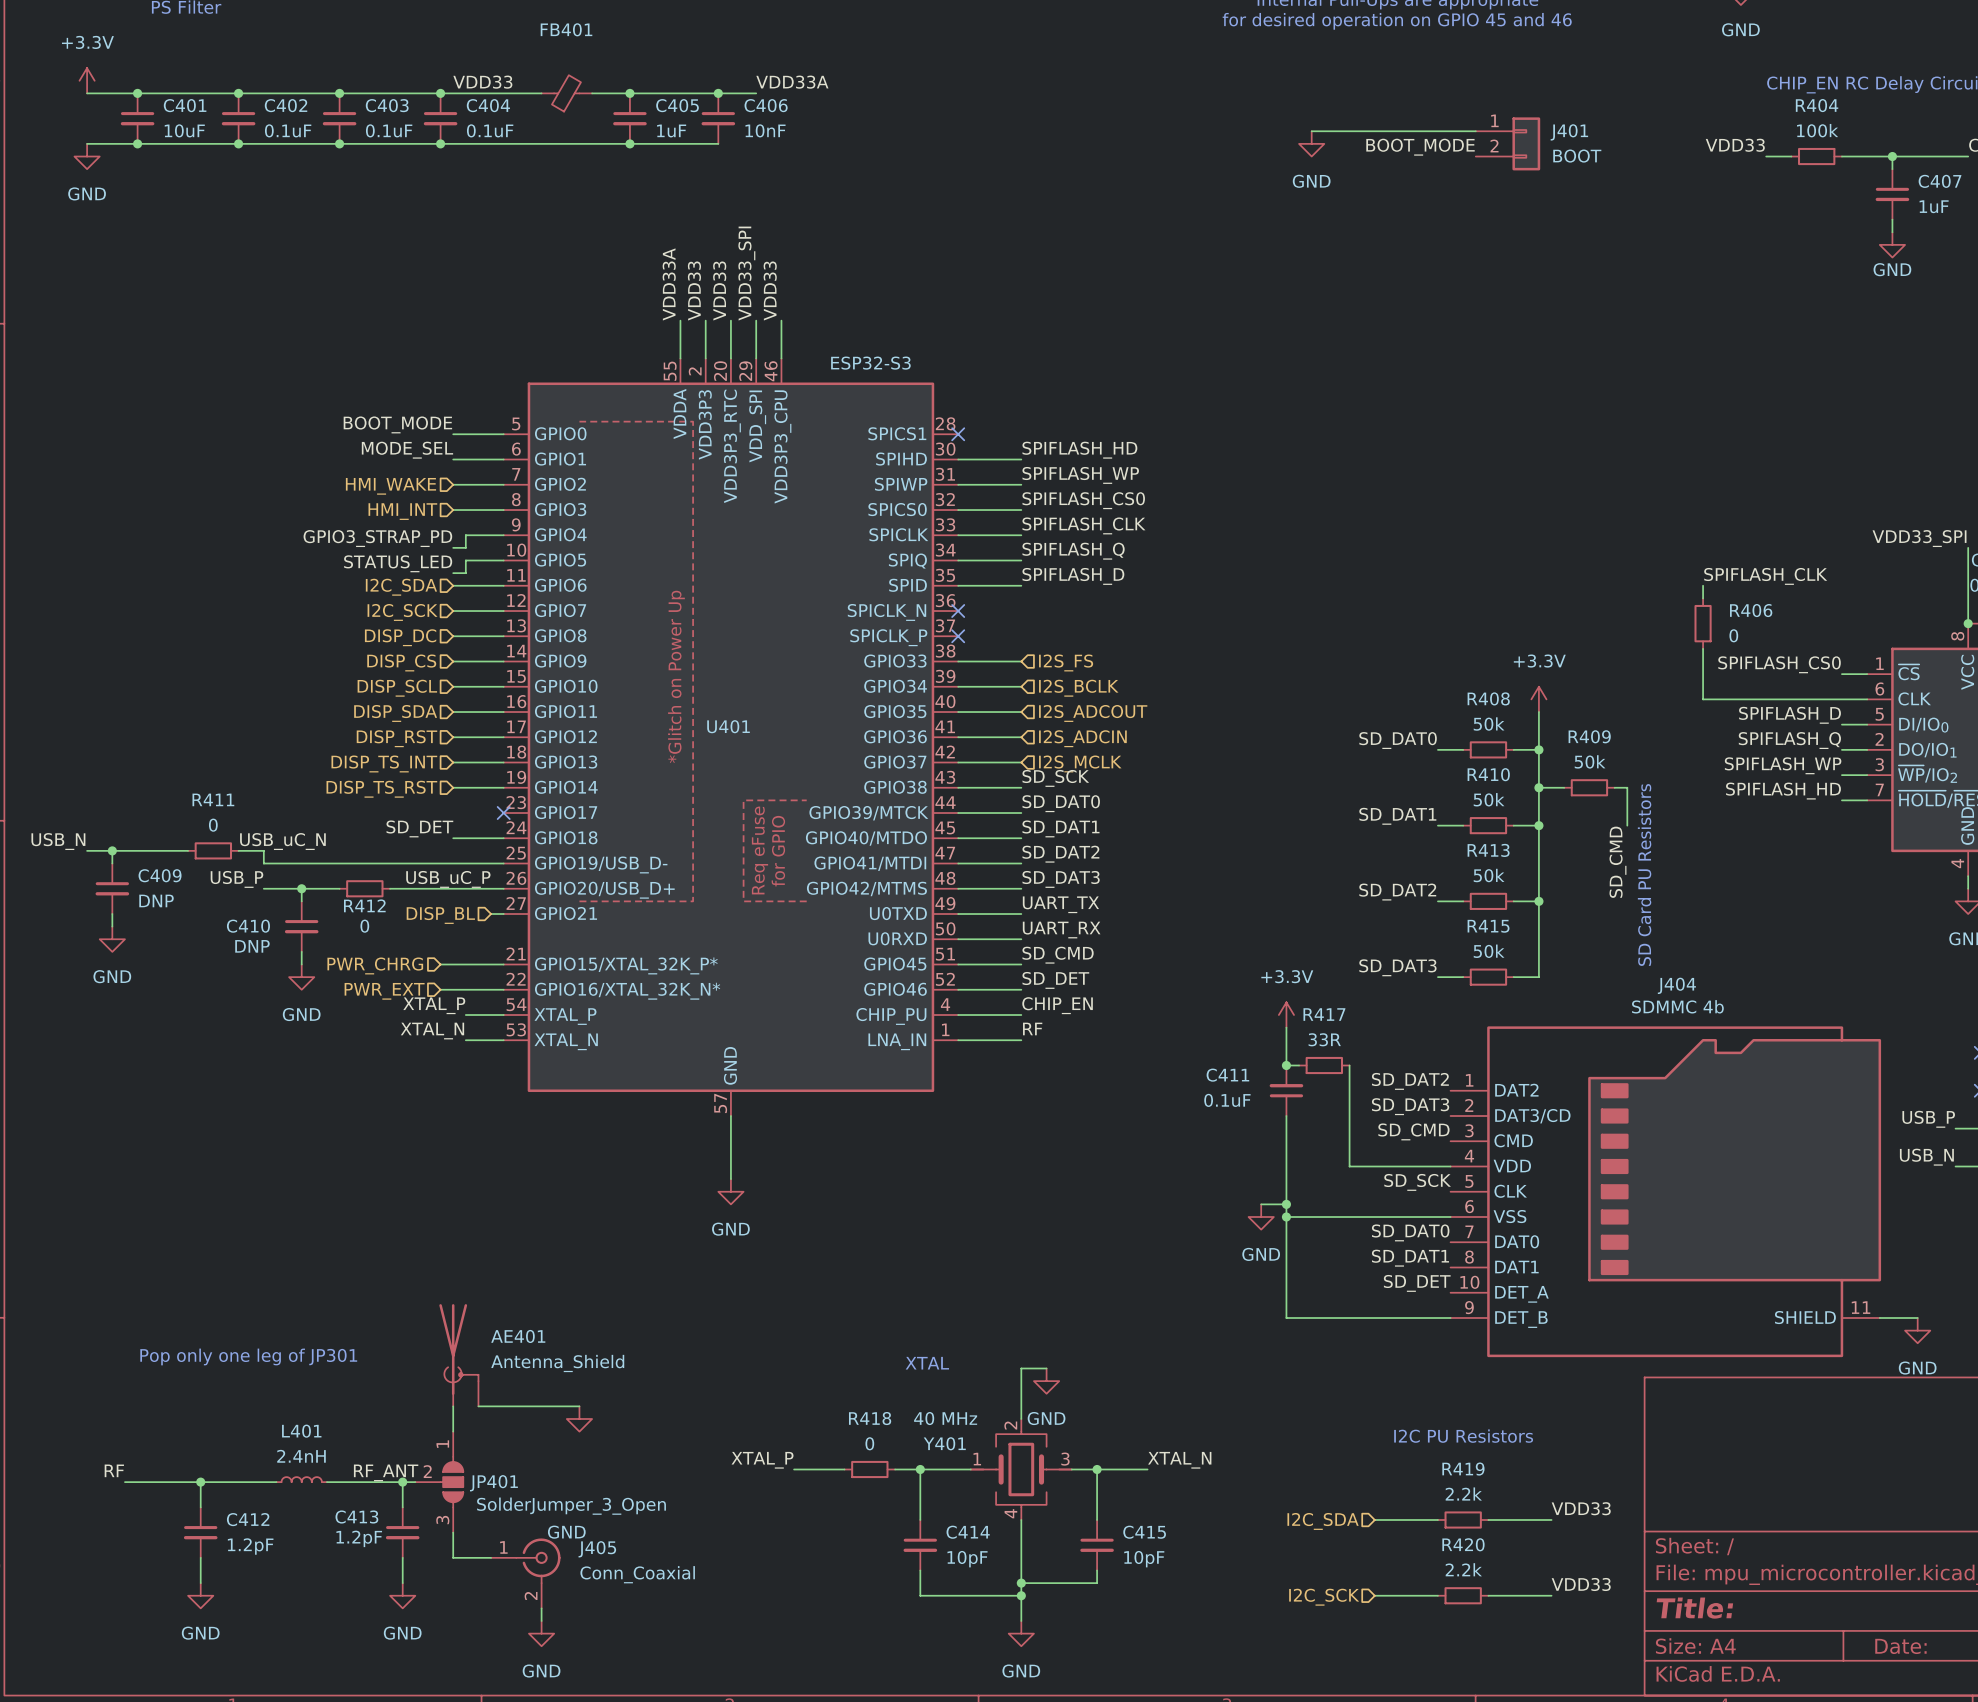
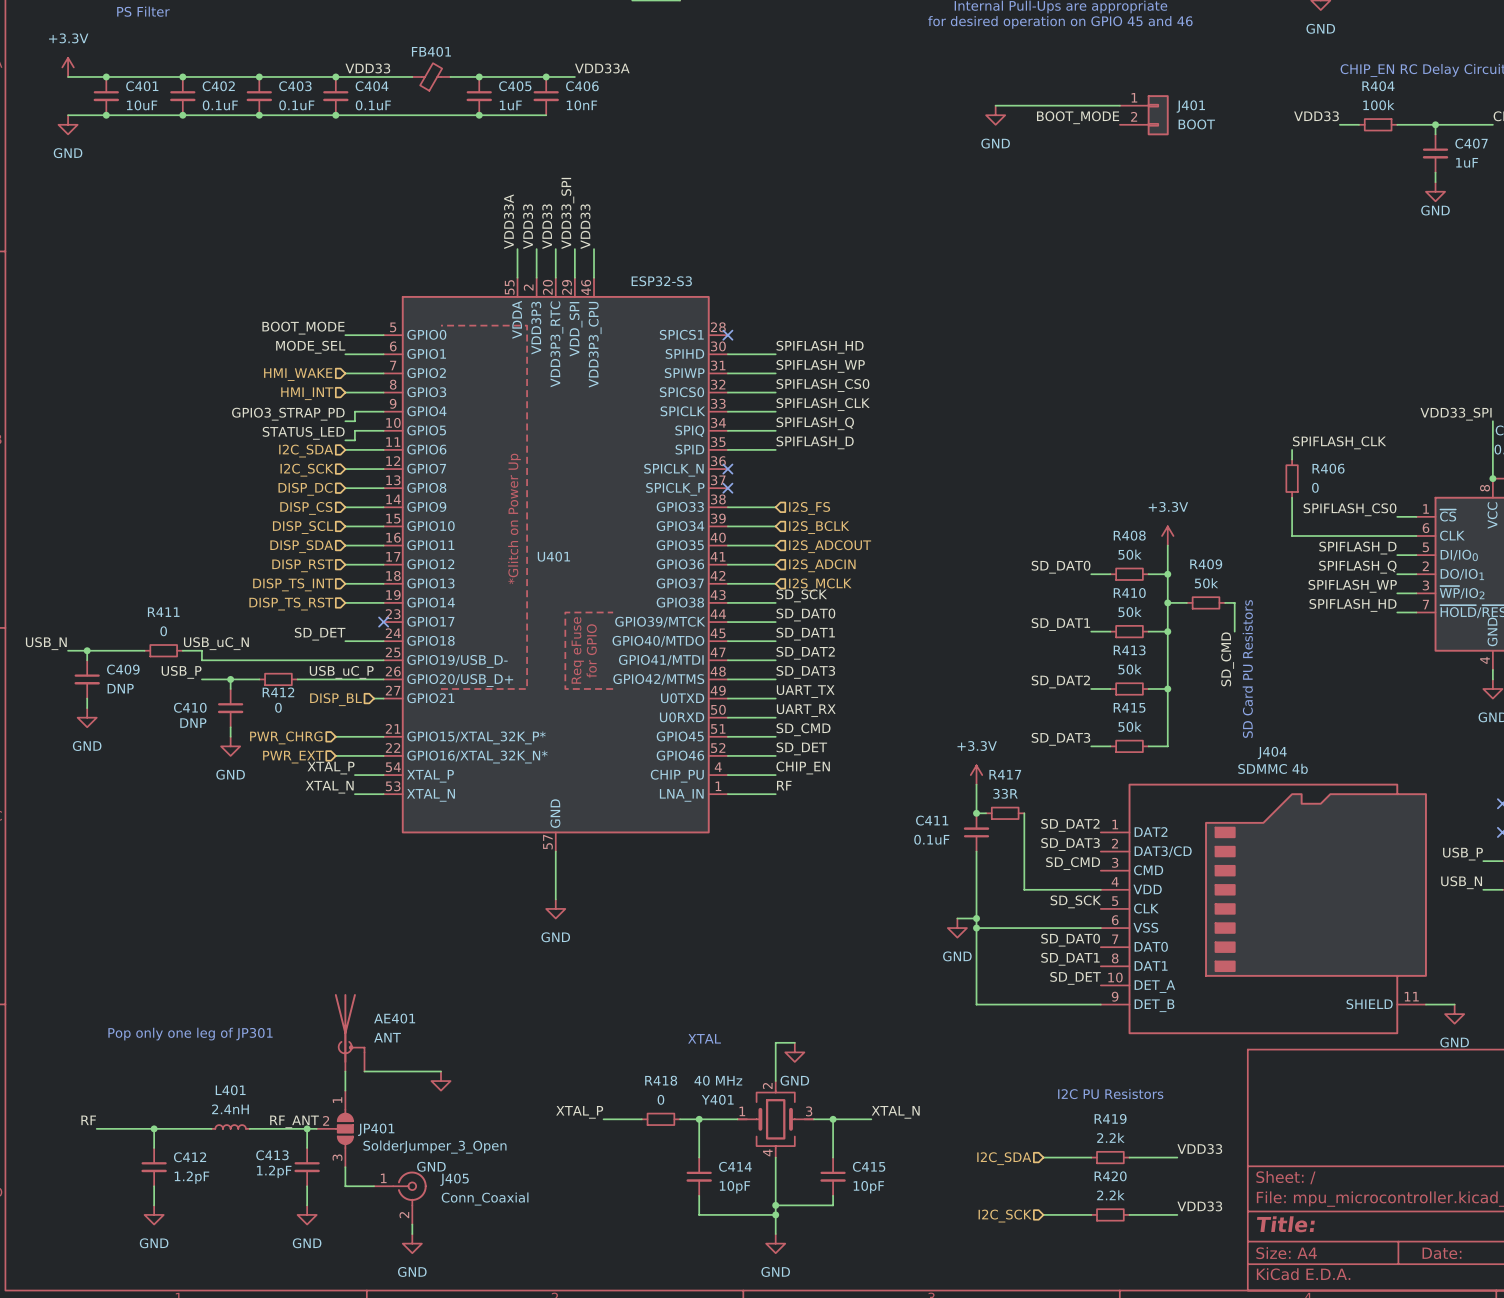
FB401 name position: FB401 (566, 29) -> FB401 (431, 51)
AE401 value: Antenna_Shield (557, 1363) -> ANT (387, 1037)

